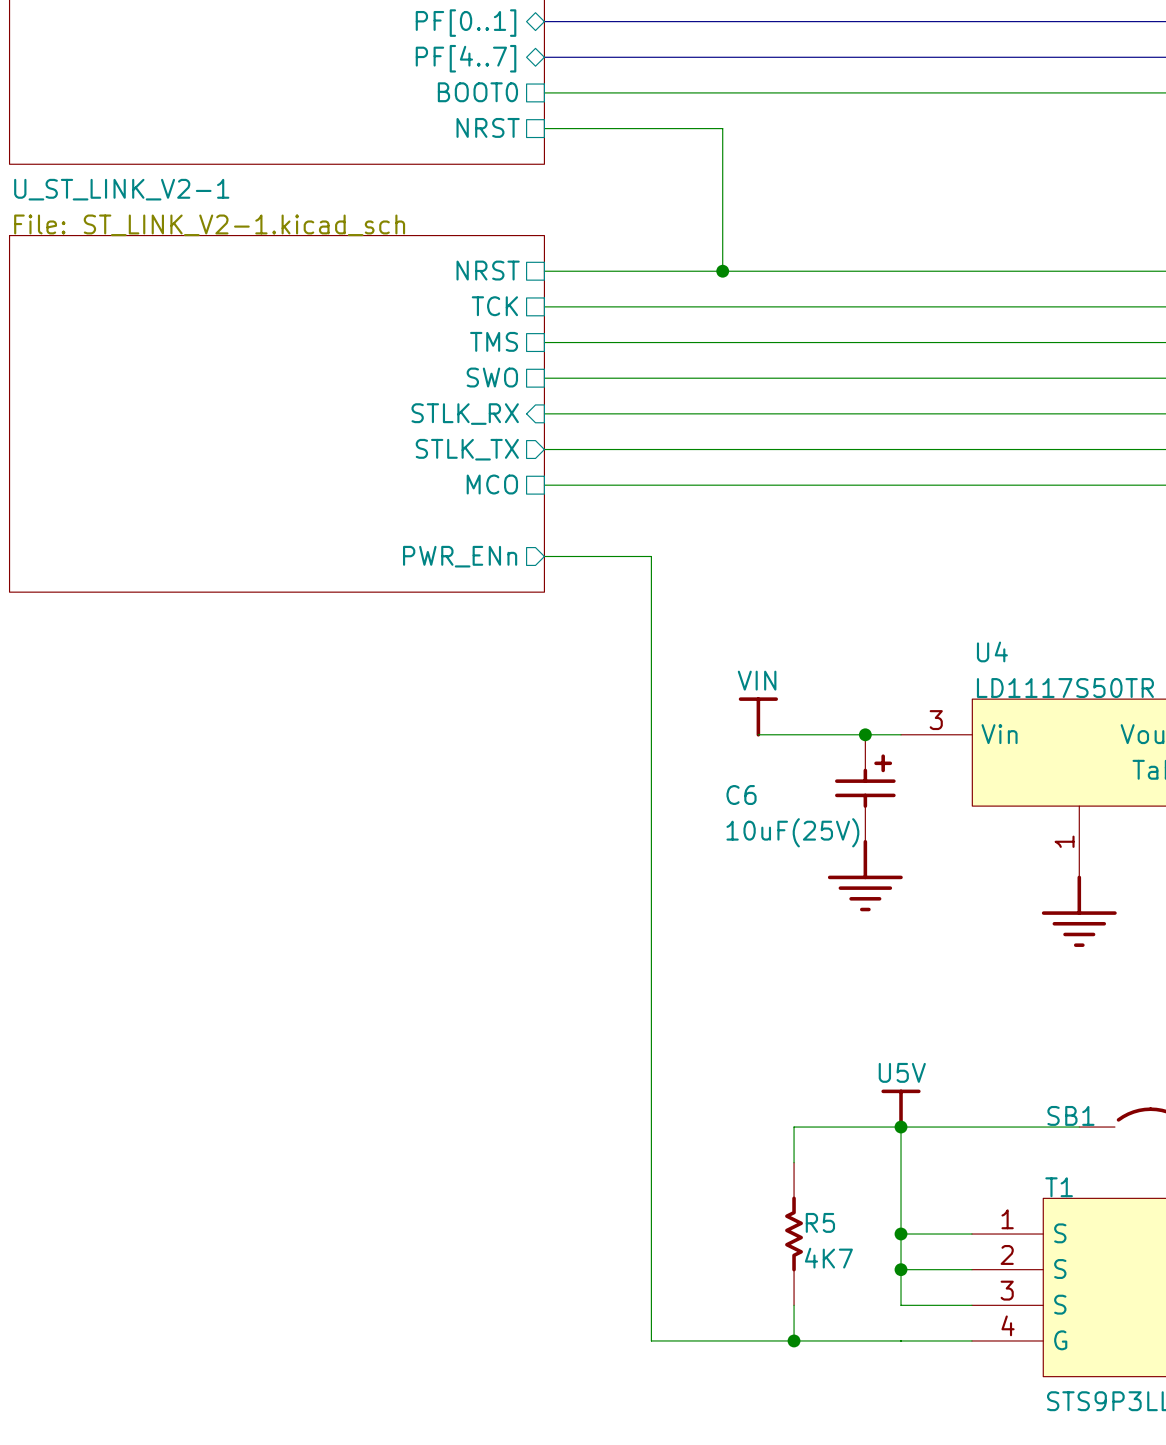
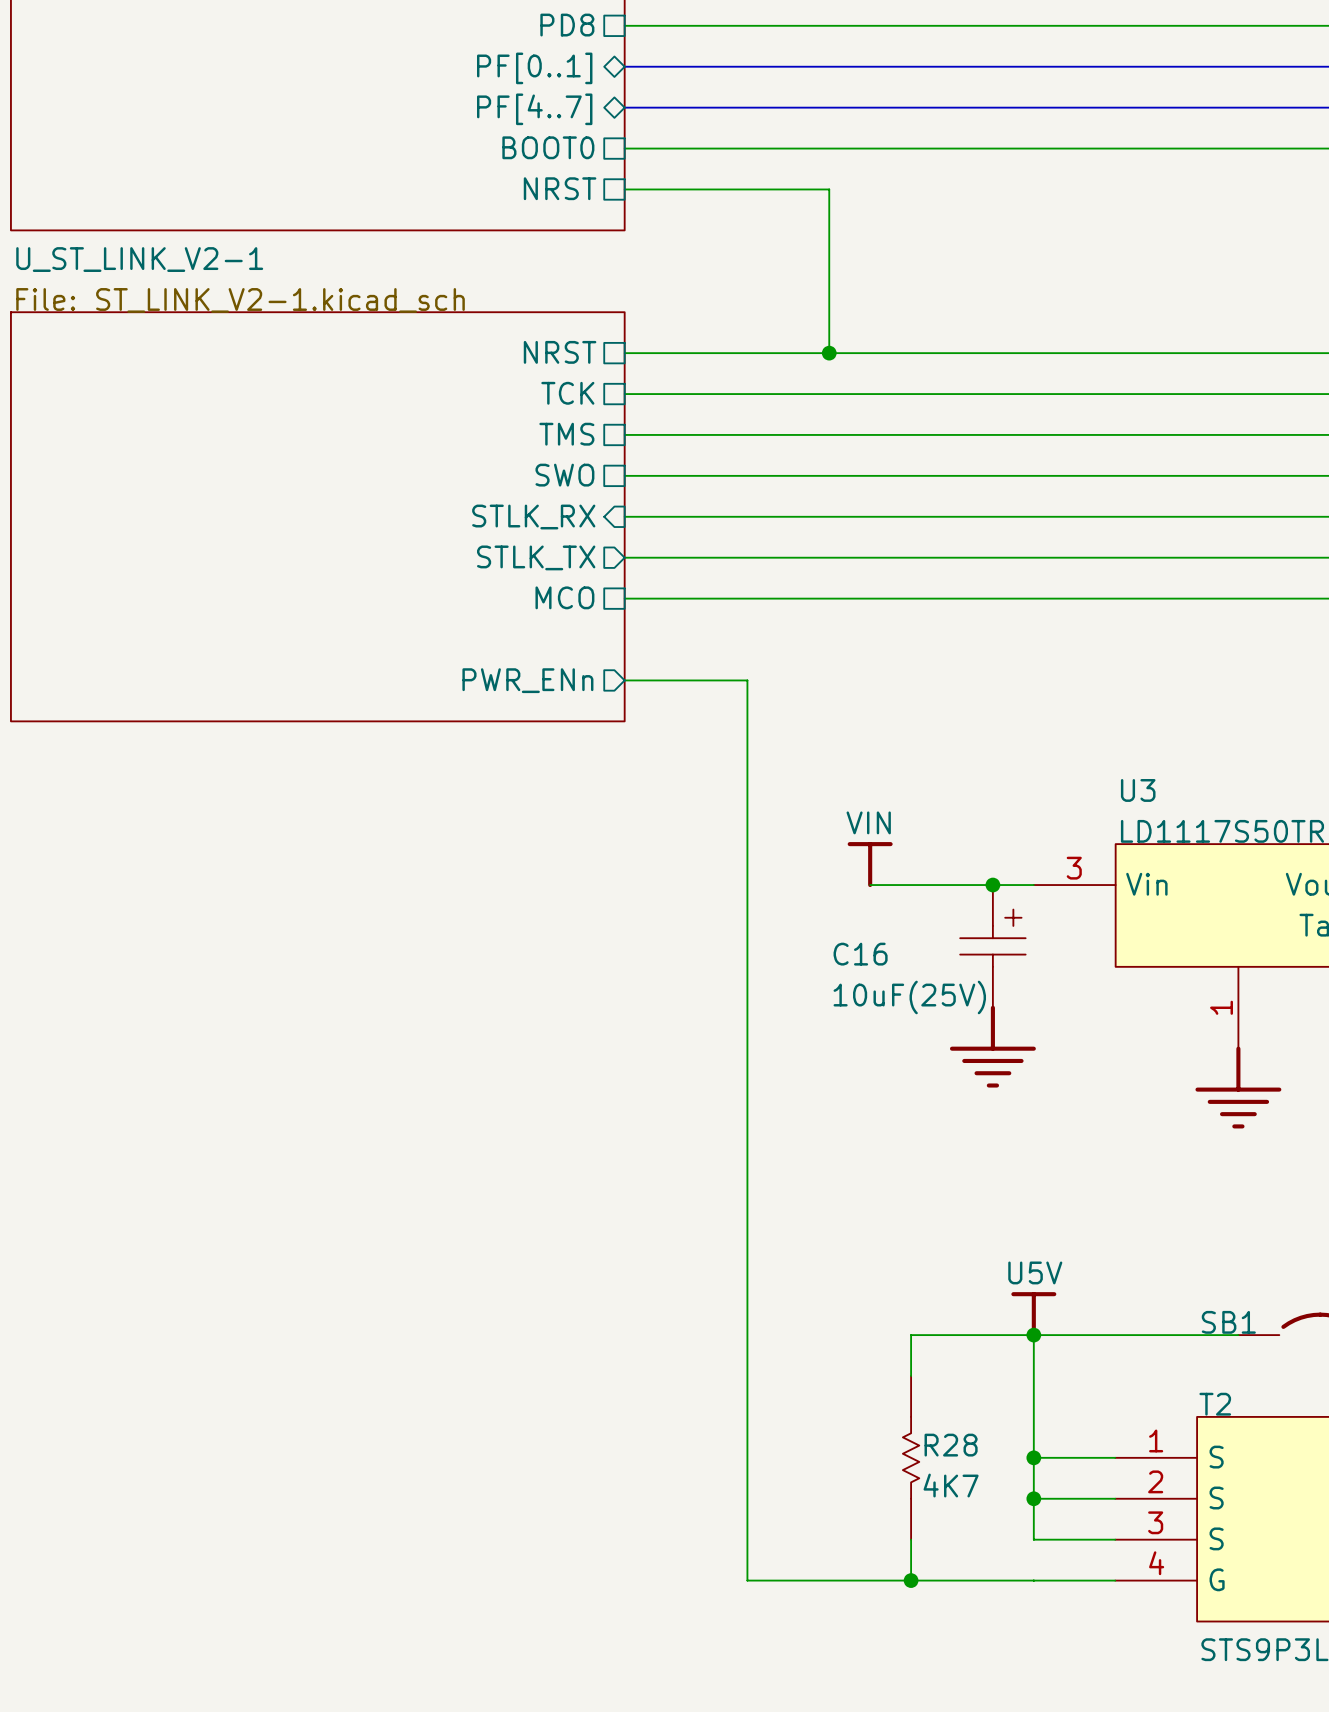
U4 name: U4 (992, 651) -> U3 (1138, 790)
C6: 10uF(25V) (865, 788) -> none
C16: none -> 10uF(25V) (992, 946)
T1 name: T1 (1059, 1187) -> T2 (1215, 1404)
R5: 4K7 (794, 1234) -> none
R28: none -> 4K7 (911, 1457)

